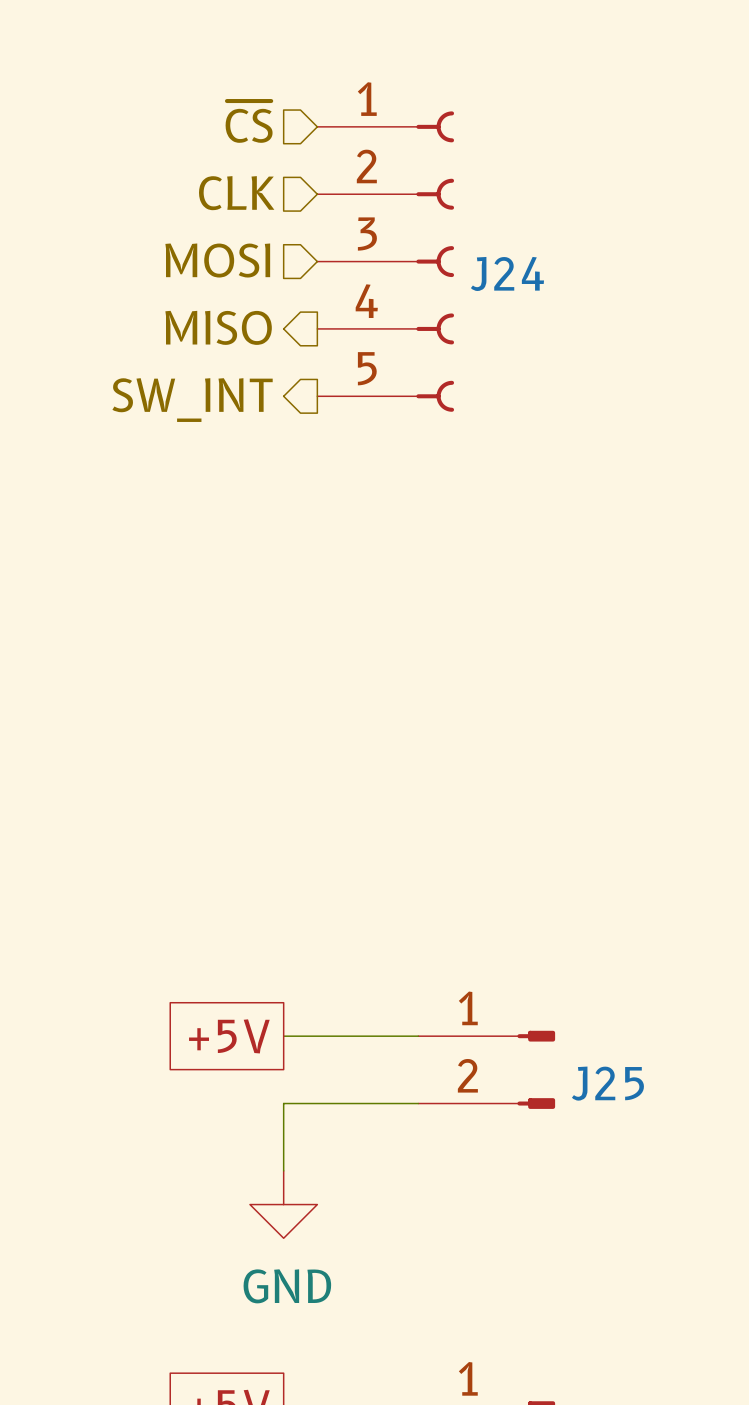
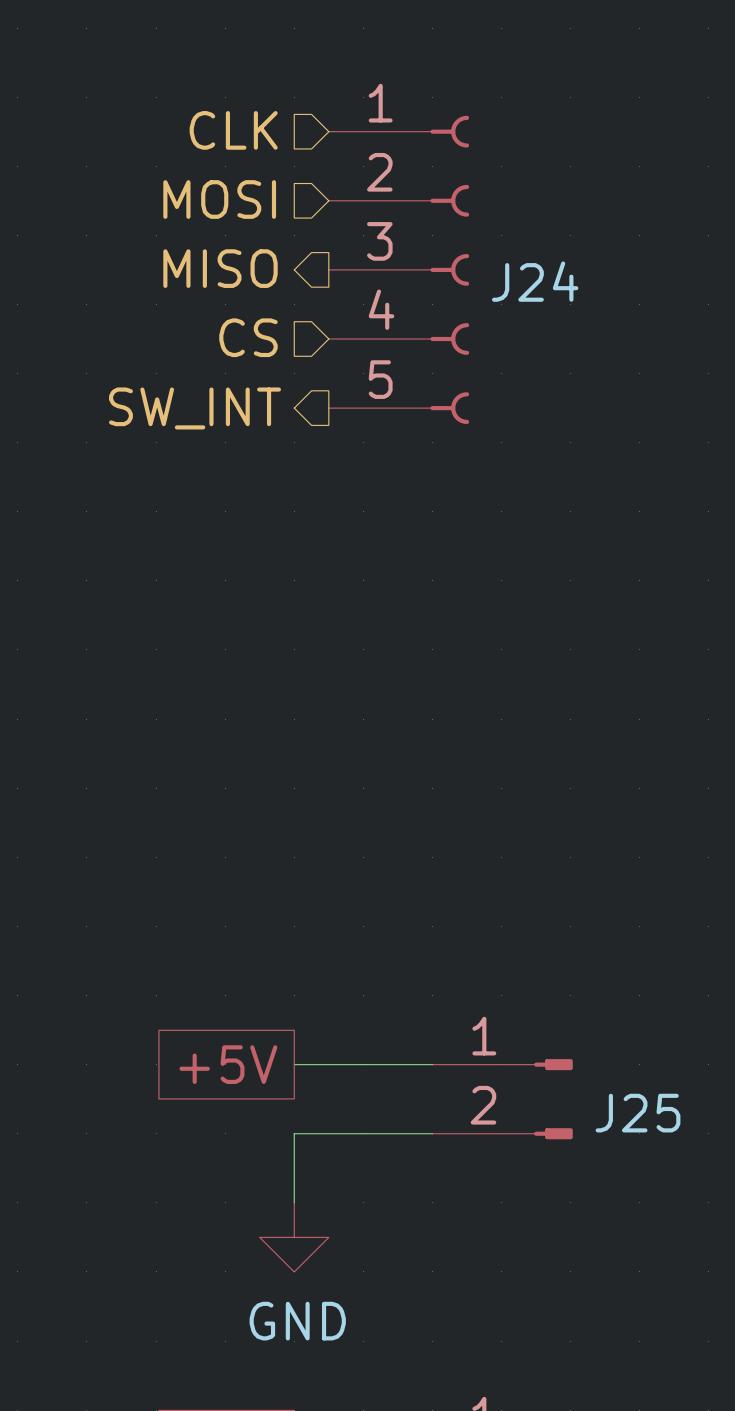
hierarchical label: ~{CS} (249, 121) -> CLK (233, 130)
hierarchical label: CLK (236, 193) -> MOSI (219, 199)
hierarchical label shape: input (217, 260) -> output (220, 268)
hierarchical label: MOSI (217, 260) -> MISO (220, 268)
hierarchical label shape: output (218, 327) -> input (248, 337)
hierarchical label: MISO (218, 327) -> CS (248, 337)

